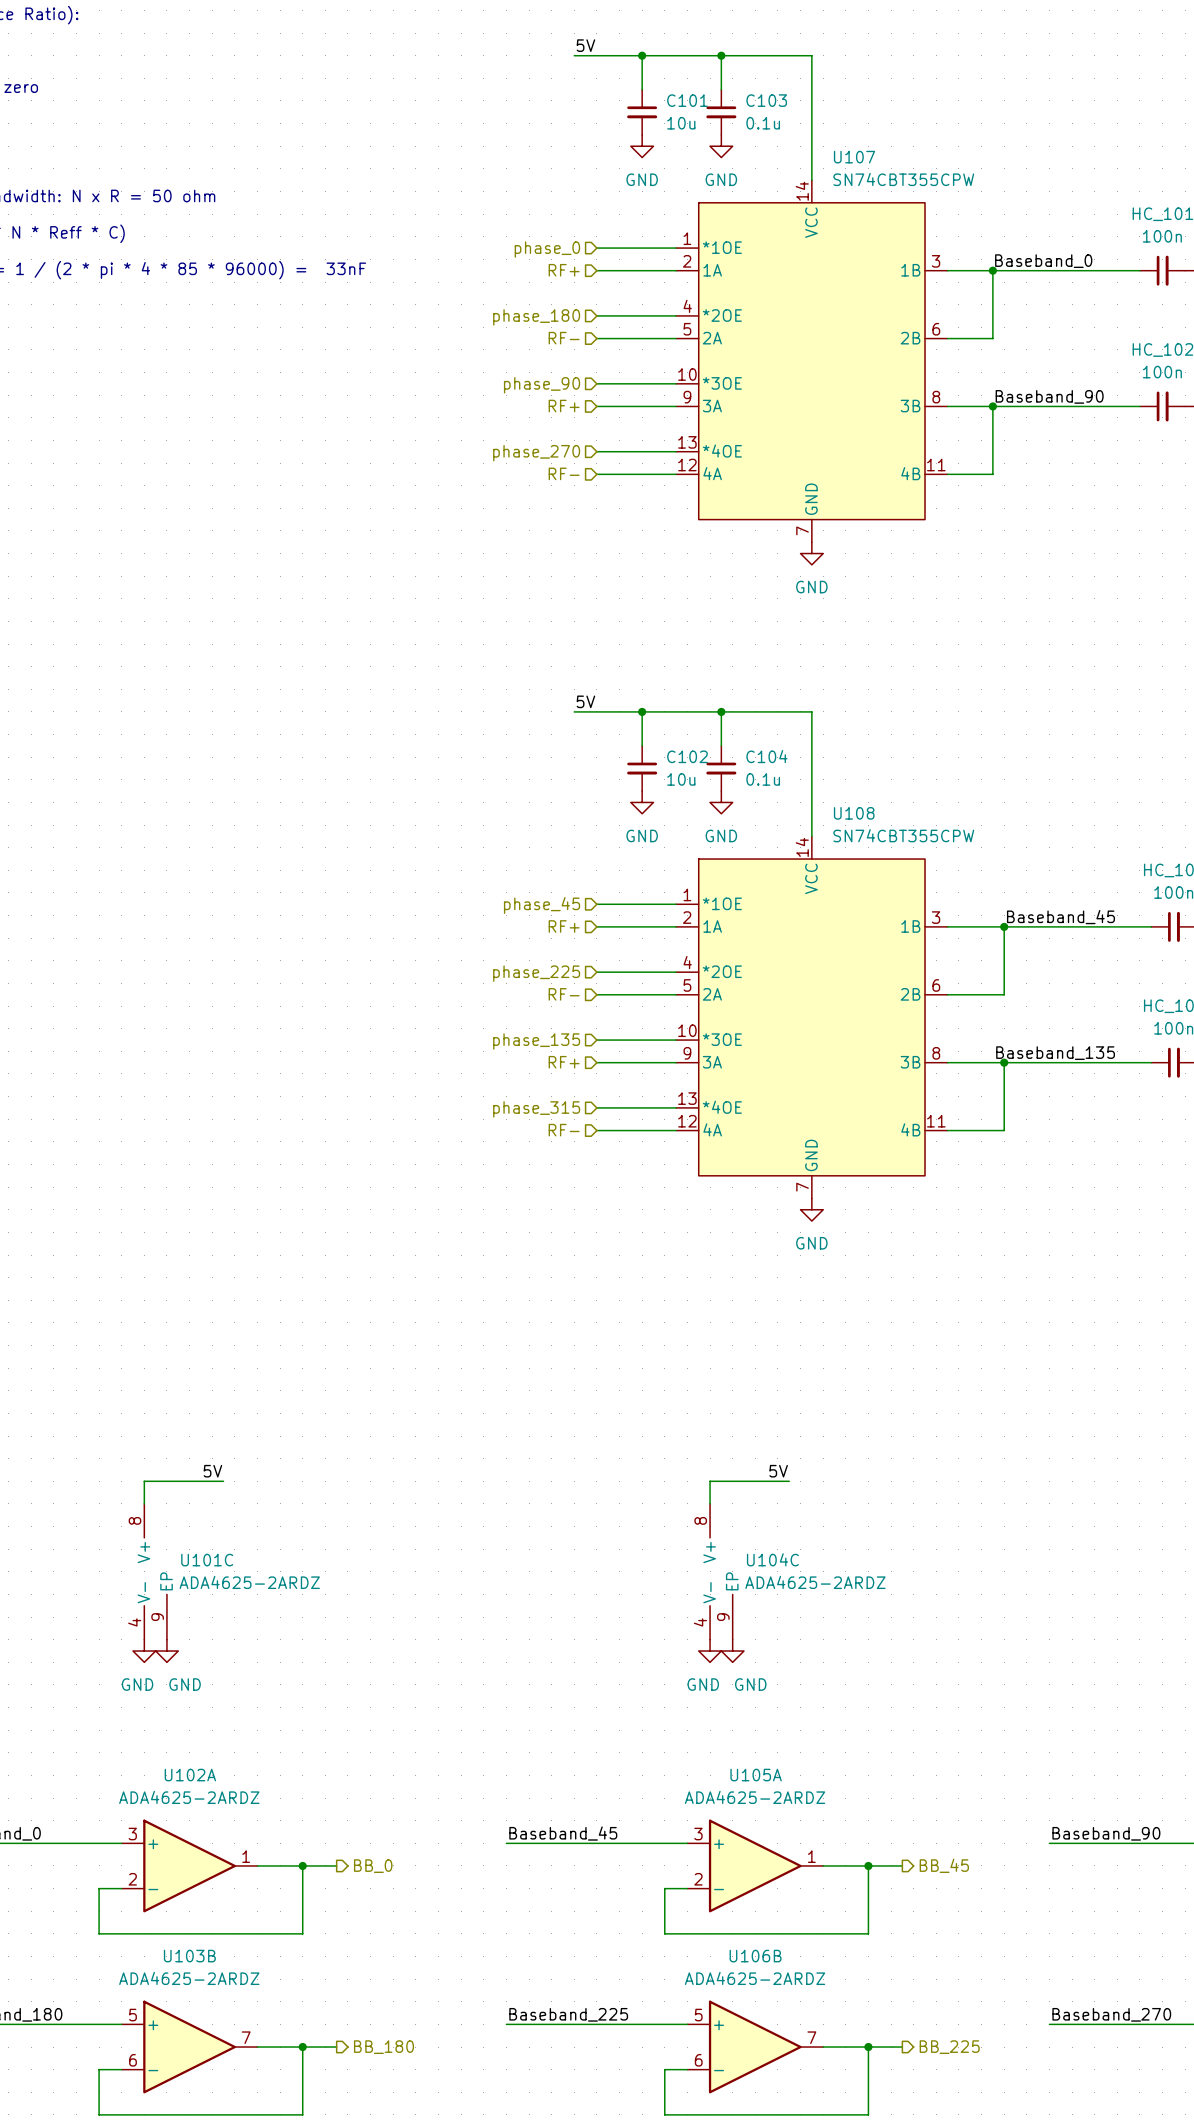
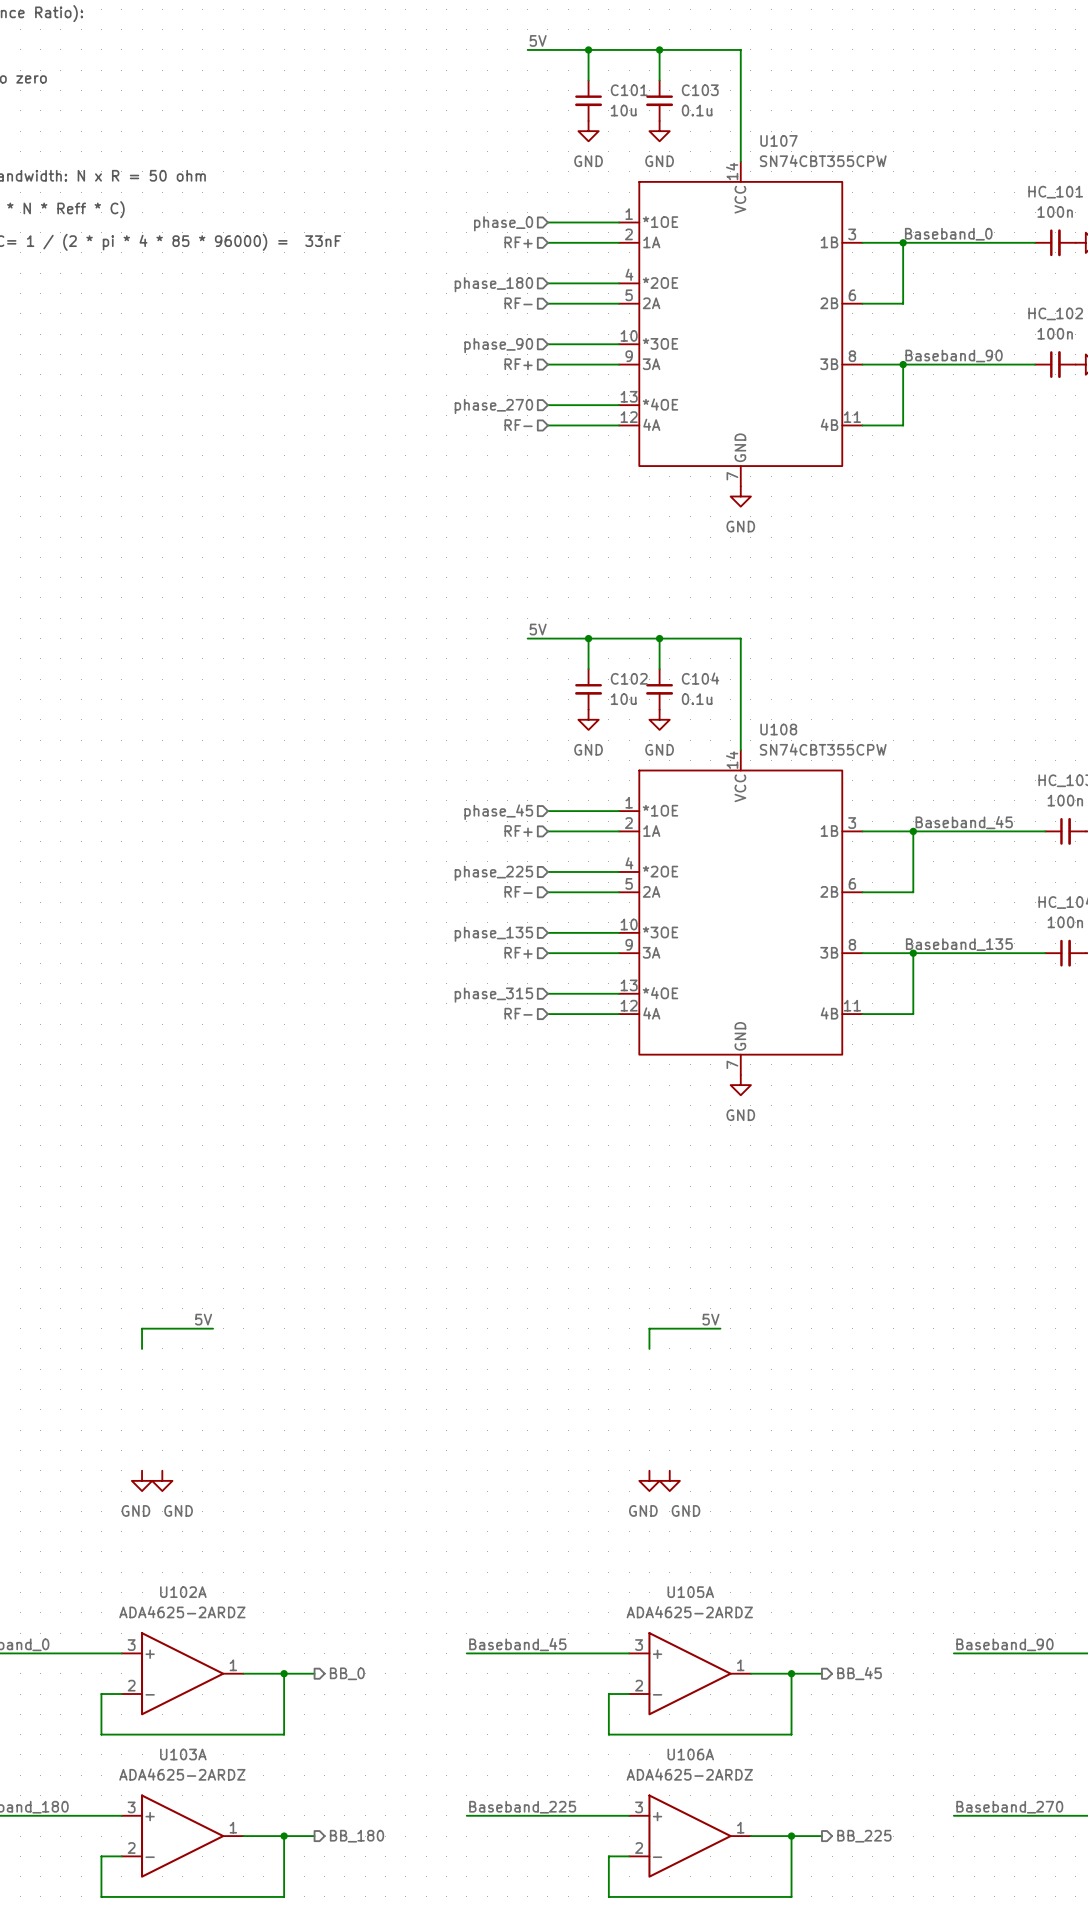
U101C: ADA4625-2ARDZ (155, 1571) -> none
U104C: ADA4625-2ARDZ (721, 1571) -> none
U103B name: U103B (189, 1956) -> U103A (183, 1754)
U106B name: U106B (755, 1956) -> U106A (690, 1754)
U103B pin number: 5 (133, 2015) -> 3 (131, 1807)
U106B pin number: 5 (698, 2015) -> 3 (639, 1807)
U103B pin number: 7 (246, 2037) -> 1 (233, 1827)
U106B pin number: 7 (811, 2037) -> 1 (740, 1827)
U103B pin number: 6 (133, 2060) -> 2 (131, 1848)
U106B pin number: 6 (698, 2060) -> 2 (639, 1848)

